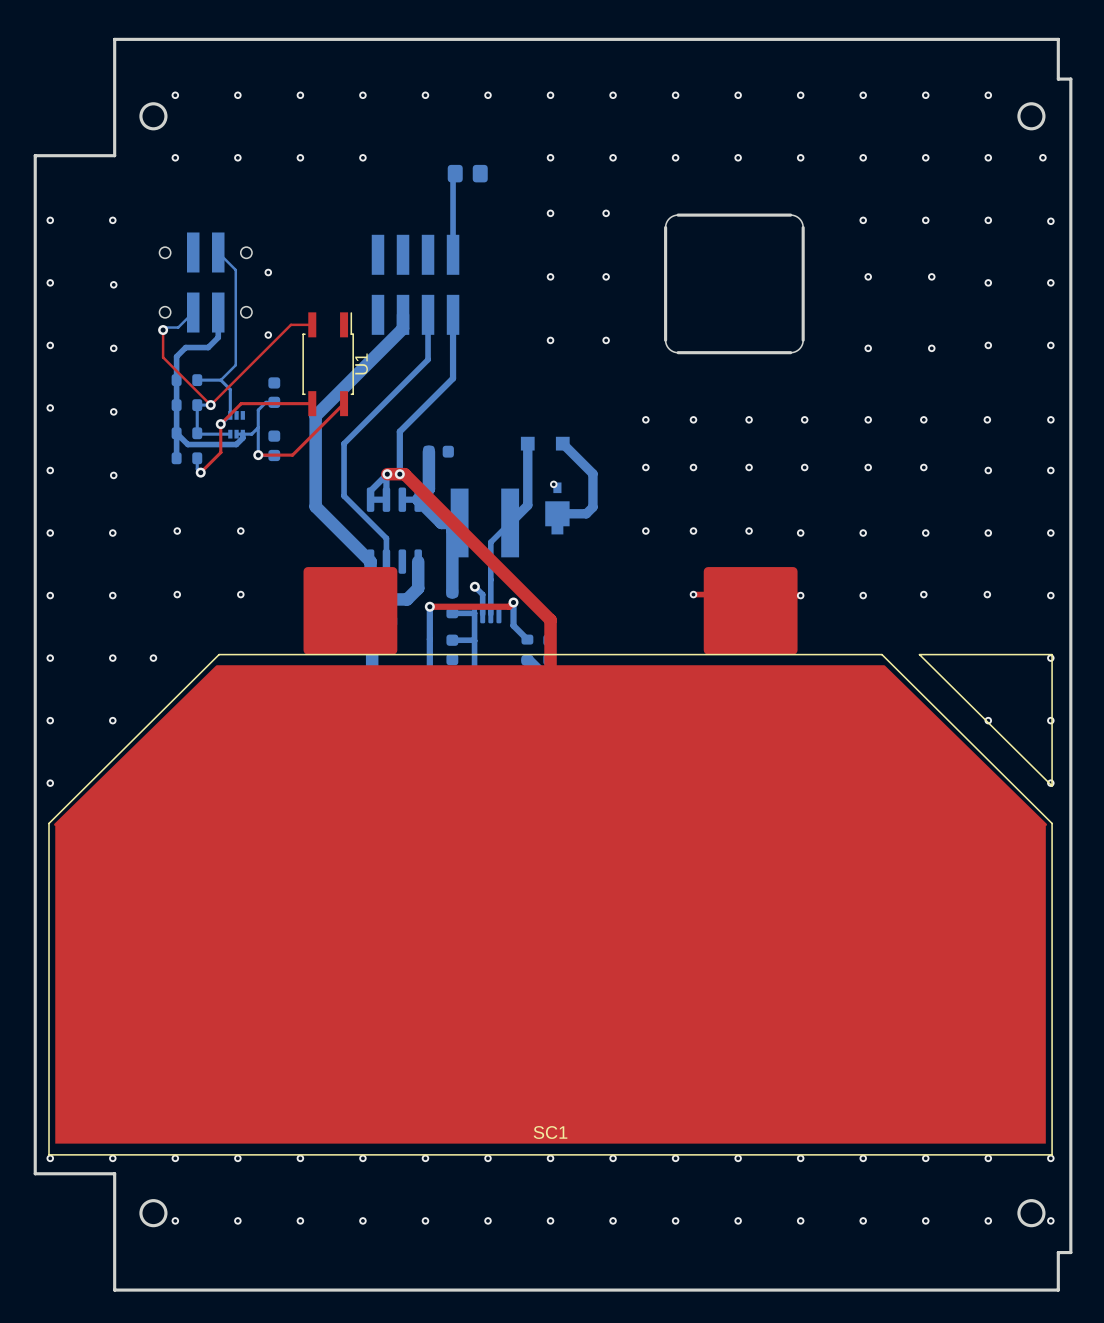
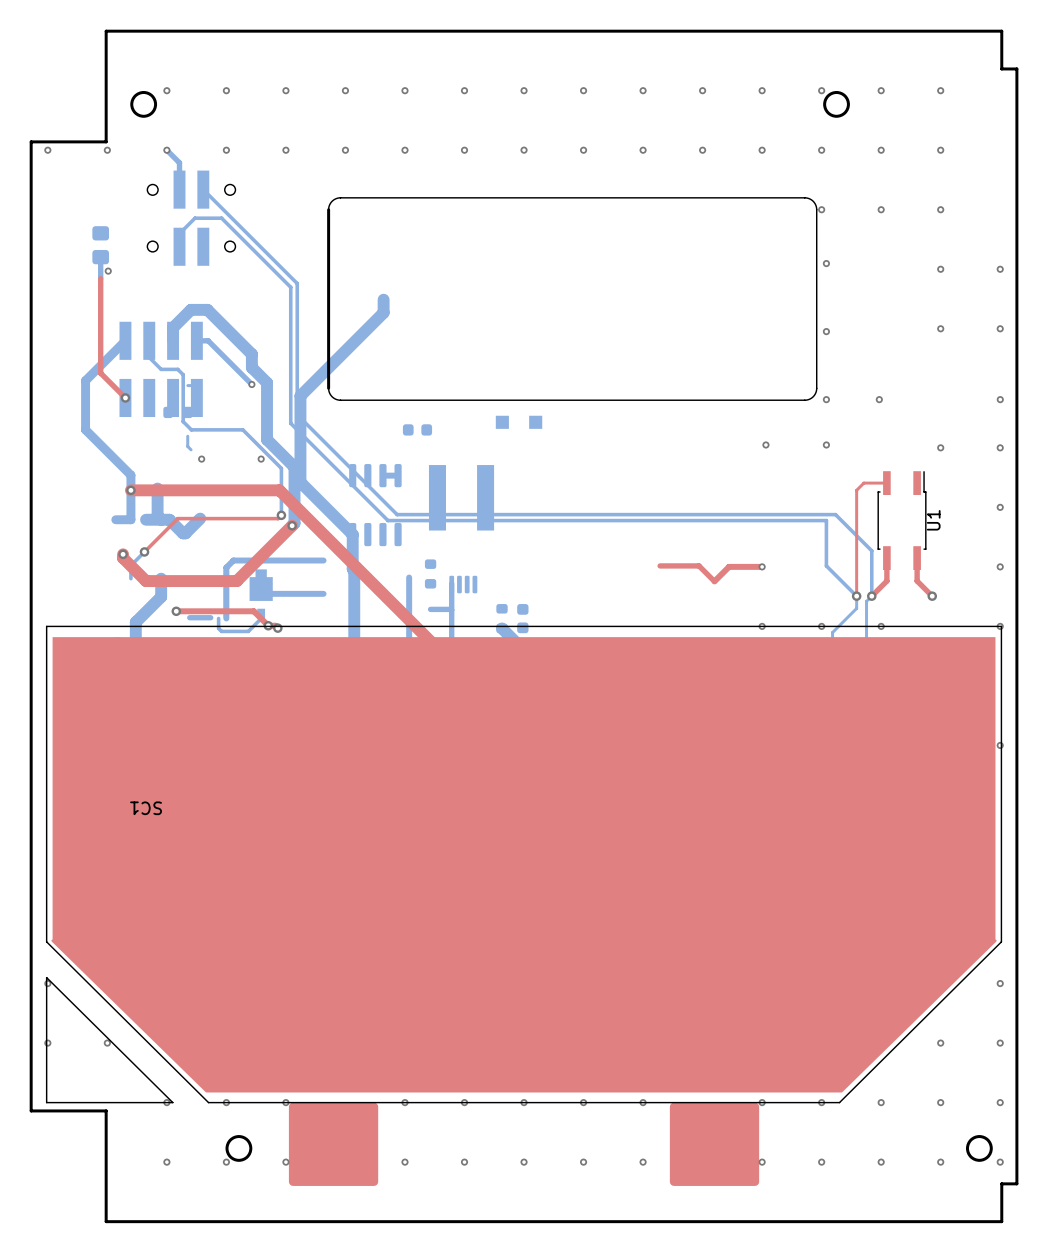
drawing shape: [33, 37, 1073, 1292] -> [29, 29, 1019, 1224]
via: none -> (47, 150)
via: none -> (107, 150)
bottom track: none -> (166, 150) (179, 162) (179, 189)
via: none -> (404, 150)
via: none -> (464, 150)
via: (1042, 157) -> none
bottom track: (455, 173) (453, 175) (453, 254) -> none
part: (467, 173) -> none
bottom track: none -> (203, 189) (297, 283) (297, 414) (397, 514) (835, 514) (871, 550) (871, 596) (866, 601) (866, 683) (841, 708) (857, 724) (857, 749) (864, 756)
via: (550, 213) -> none
via: (606, 213) -> none
via: (50, 220) -> none
via: (112, 220) -> none
via: (1050, 221) -> none
bottom track: (218, 252) (235, 270) (235, 365) (220, 380) -> none
part: none -> (100, 245)
bottom track: none -> (179, 246) (179, 233) (194, 218) (221, 218) (290, 287) (290, 423) (387, 520) (826, 520) (826, 565) (856, 596) (856, 608) (832, 632) (832, 723) (841, 732) (841, 759) (832, 767) (832, 788) (836, 792) (860, 792) (877, 774)
bottom track: none -> (100, 257) (100, 278)
via: (268, 272) -> none
via: (550, 276) -> none
via: (606, 276) -> none
via: (931, 276) -> none
via: (50, 282) -> none
part position: (205, 282) -> (191, 218)
part position: (415, 284) -> (161, 369)
top track: none -> (100, 278) (100, 373) (125, 397)
bottom track: (193, 312) (178, 327) (165, 327) (163, 330) -> none
bottom track: (218, 312) (218, 337) (208, 347) (185, 347) (176, 356) (176, 458) -> none
bottom track: (428, 314) (428, 359) (344, 443) (344, 496) (386, 538) (386, 561) -> none
bottom track: (453, 314) (453, 378) (399, 431) (399, 474) -> none
top track: (312, 324) (290, 324) (210, 405) (163, 357) (163, 330) -> none
via: (163, 330) -> none
via: (268, 335) -> none
via: (550, 340) -> none
via: (606, 340) -> none
via: (50, 345) -> none
via: (113, 348) -> none
via: (931, 348) -> none
bottom track: none -> (125, 340) (85, 380) (85, 429) (130, 475) (130, 519) (115, 519)
bottom track: none -> (149, 340) (149, 357) (161, 369) (177, 369) (183, 374) (183, 421) (191, 429) (242, 429) (281, 468) (281, 515)
bottom track: none -> (173, 340) (173, 327) (190, 309) (207, 309) (251, 354) (251, 367) (267, 382) (267, 439) (294, 467) (294, 523) (292, 525)
bottom track: none -> (196, 340) (208, 340) (251, 384)
U1 position: (328, 364) -> (902, 520)
part: (186, 380) -> none
bottom track: (197, 380) (220, 380) -> none
bottom track: (220, 380) (230, 389) (230, 415) (220, 424) -> none
part: (274, 392) -> none
bottom track: (274, 402) (266, 402) (258, 410) (258, 455) (274, 455) -> none
via: none -> (251, 384)
top track: (312, 403) (241, 403) (220, 424) (220, 452) -> none
top track: (344, 403) (292, 455) (258, 455) -> none
part: (186, 405) -> none
bottom track: (197, 405) (198, 434) (230, 434) -> none
via: (210, 405) -> none
via: (50, 407) -> none
via: (113, 411) -> none
via: none -> (125, 397)
via: (645, 419) -> none
via: (693, 419) -> none
via: (749, 419) -> none
via: (804, 419) -> none
via: (987, 419) -> none
via: (220, 424) -> none
part: (236, 424) -> none
bottom track: (258, 427) (251, 434) (236, 434) -> none
bottom track: (176, 433) (187, 444) (236, 444) (242, 438) (242, 434) -> none
bottom track: (527, 443) (527, 505) (490, 542) (490, 614) -> none
bottom track: (562, 443) (592, 473) (592, 507) (586, 513) (557, 513) -> none
part: (274, 445) -> none
bottom track: (428, 451) (428, 489) (418, 499) (441, 522) (459, 522) (452, 530) (452, 592) -> none
top track: (220, 452) (200, 472) -> none
via: (258, 455) -> none
part: (186, 458) -> none
via: (645, 467) -> none
via: (693, 467) -> none
via: (749, 467) -> none
via: (923, 467) -> none
via: (50, 470) -> none
via: (200, 472) -> none
top track: (387, 474) (404, 474) (550, 620) (550, 772) -> (130, 490) (279, 490) (524, 734)
bottom track: (387, 474) (370, 490) (370, 499) (386, 499) (386, 475) -> none
via: (387, 474) -> none
via: (399, 474) -> none
via: (113, 475) -> none
via: none -> (201, 459)
via: none -> (261, 459)
via: (553, 484) -> none
top track: none -> (886, 483) (863, 483) (856, 490) (856, 596)
part rotation: 0° (557, 508) -> 180° (261, 594)
part position: (557, 508) -> (261, 594)
bottom track: none -> (157, 488) (157, 516) (161, 519)
via: none -> (130, 490)
via: (177, 531) -> none
via: (240, 531) -> none
via: (645, 531) -> none
via: (693, 531) -> none
via: (749, 531) -> none
via: (50, 533) -> none
via: (112, 533) -> none
via: (800, 533) -> none
via: (863, 533) -> none
via: (925, 533) -> none
via: (988, 533) -> none
top track: none -> (281, 515) (278, 518) (177, 518) (144, 551)
via: none -> (281, 515)
bottom track: none -> (200, 518) (185, 533) (183, 533) (169, 519) (146, 519)
top track: none -> (292, 525) (236, 581) (146, 581) (123, 558) (123, 554)
via: none -> (292, 525)
bottom track: (418, 561) (418, 588) (407, 599) (391, 599) -> none
bottom track: none -> (144, 551) (130, 565) (130, 578)
via: none -> (144, 551)
via: none -> (123, 554)
bottom track: (474, 586) (482, 594) (482, 614) -> none
via: (474, 586) -> none
top track: none -> (886, 558) (886, 581) (871, 596)
top track: none -> (917, 558) (917, 581) (932, 596)
bottom track: none -> (323, 560) (233, 560) (226, 567) (226, 618)
via: (177, 594) -> none
via: (240, 594) -> none
via: (693, 594) -> none
via: (923, 594) -> none
via: (987, 594) -> none
via: (50, 595) -> none
via: (112, 595) -> none
via: (863, 595) -> none
top track: (513, 602) (509, 606) (429, 606) -> none
bottom track: (513, 602) (513, 625) (526, 640) -> none
via: (513, 602) -> none
via: (429, 606) -> none
bottom track: none -> (161, 578) (161, 596) (135, 622) (135, 643)
bottom track: (452, 613) (474, 613) -> (189, 617) (210, 617)
bottom track: none -> (261, 589) (265, 593) (323, 593)
via: none -> (856, 596)
via: none -> (871, 596)
via: none -> (932, 596)
top track: none -> (176, 611) (253, 611) (268, 625) (275, 625) (277, 628)
via: none -> (176, 611)
bottom track: none -> (218, 618) (218, 628) (221, 631) (248, 631) (261, 618)
part: (452, 649) -> none
via: none -> (268, 625)
via: (50, 658) -> none
via: (112, 658) -> none
via: (153, 658) -> none
via: none -> (762, 626)
via: none -> (821, 626)
via: none -> (881, 626)
via: none -> (277, 628)
via: (50, 720) -> none
via: (112, 720) -> none
via: (988, 720) -> none
via: (1050, 720) -> none
via: (50, 783) -> none
SC1 rotation: 0° (550, 861) -> 180° (524, 905)
via: none -> (47, 983)
via: none -> (1000, 983)
via: none -> (47, 1043)
via: none -> (107, 1043)
via: none -> (940, 1043)
via: none -> (1000, 1043)
SC1 name position: SC1 (550, 1132) -> SC1 (146, 808)
via: (50, 1158) -> none
via: (112, 1158) -> none
via: (362, 1158) -> none
via: (738, 1158) -> none
via: (362, 1220) -> none
via: (738, 1220) -> none

